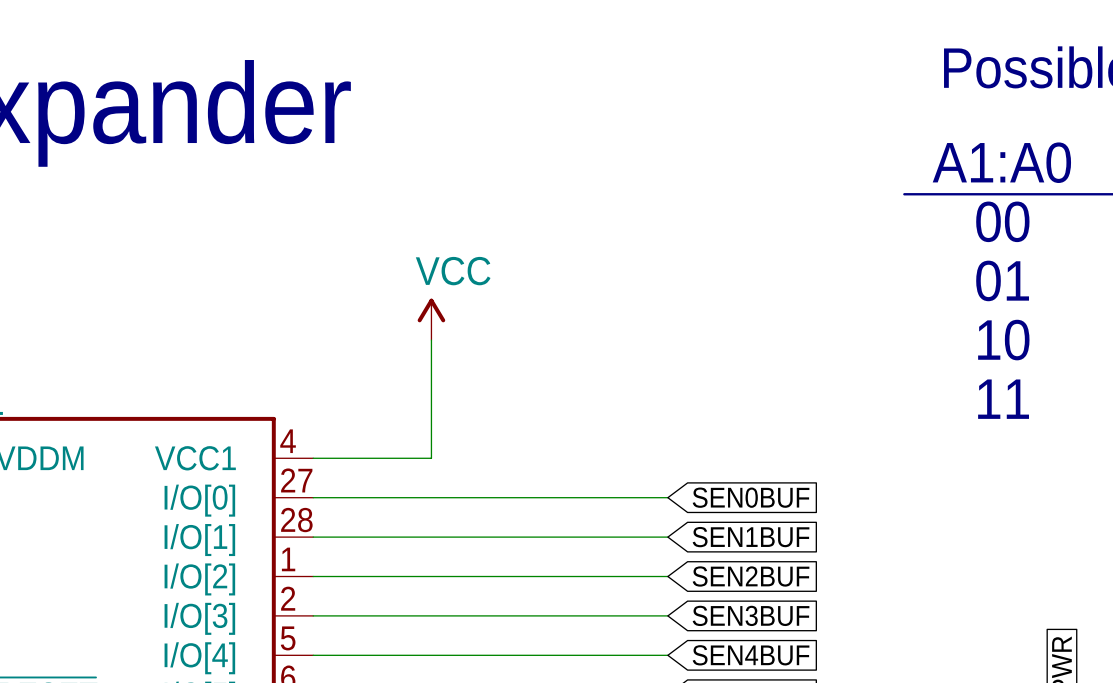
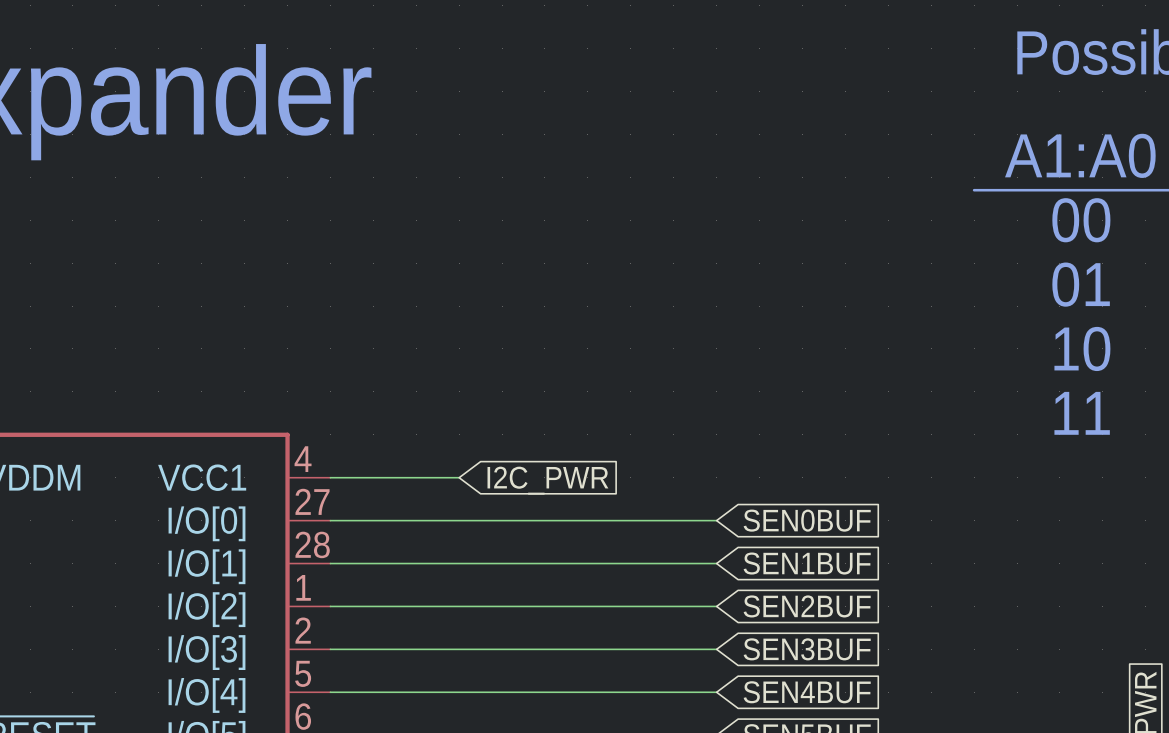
power symbol: VCC (431, 319) -> none
wire: (431, 340) (431, 458) -> none
global label: none -> I2C_PWR (547, 480)

